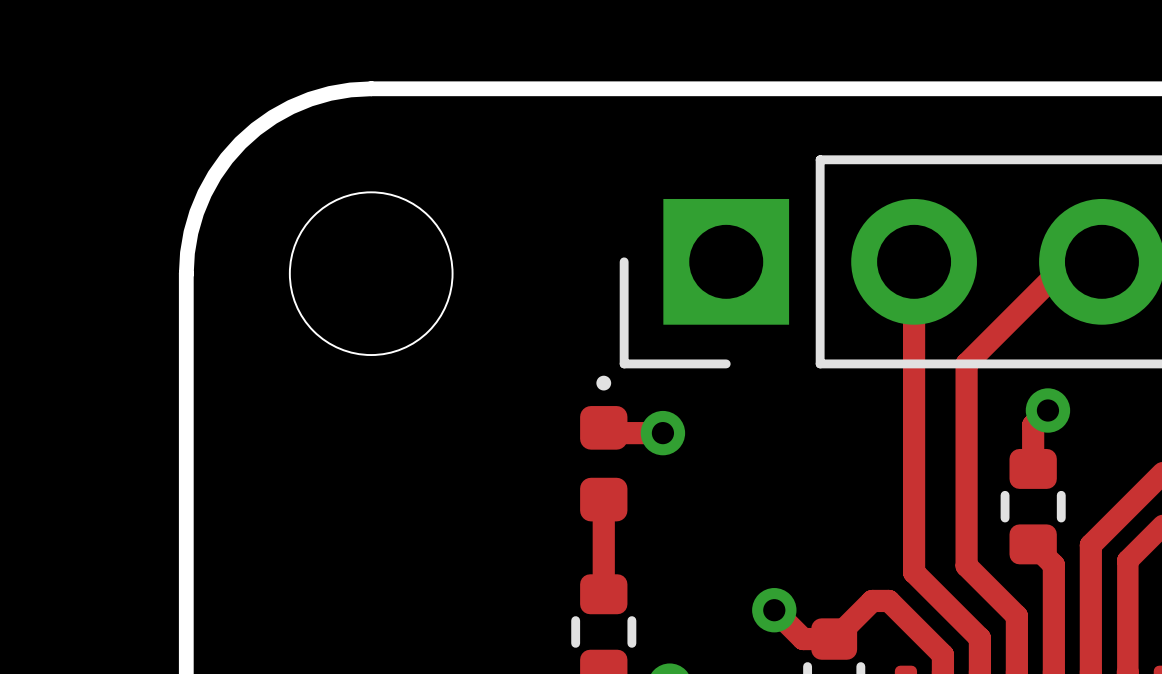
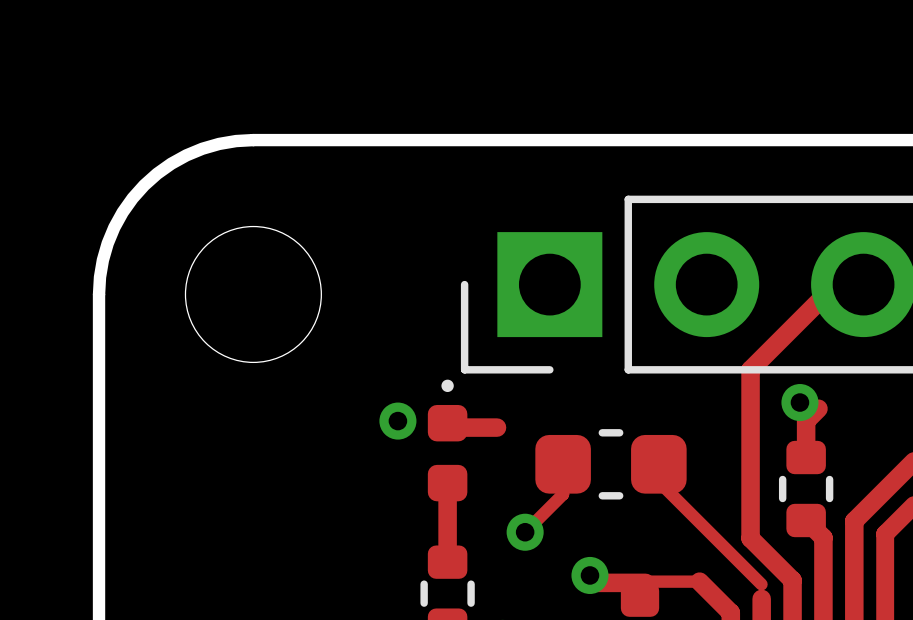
track: (914, 261) (914, 572) (979, 638) -> none
via position: (1047, 410) -> (799, 402)
via: none -> (397, 421)
via: (662, 433) -> none
track: none -> (563, 464) (563, 494) (525, 532)
part: none -> (610, 464)
track: none -> (658, 481) (761, 584)
via: none -> (525, 532)
track: (905, 617) (888, 600) (872, 600) (834, 639) (803, 639) (783, 619) -> (699, 581) (646, 581)
track: none -> (597, 582) (645, 582)

